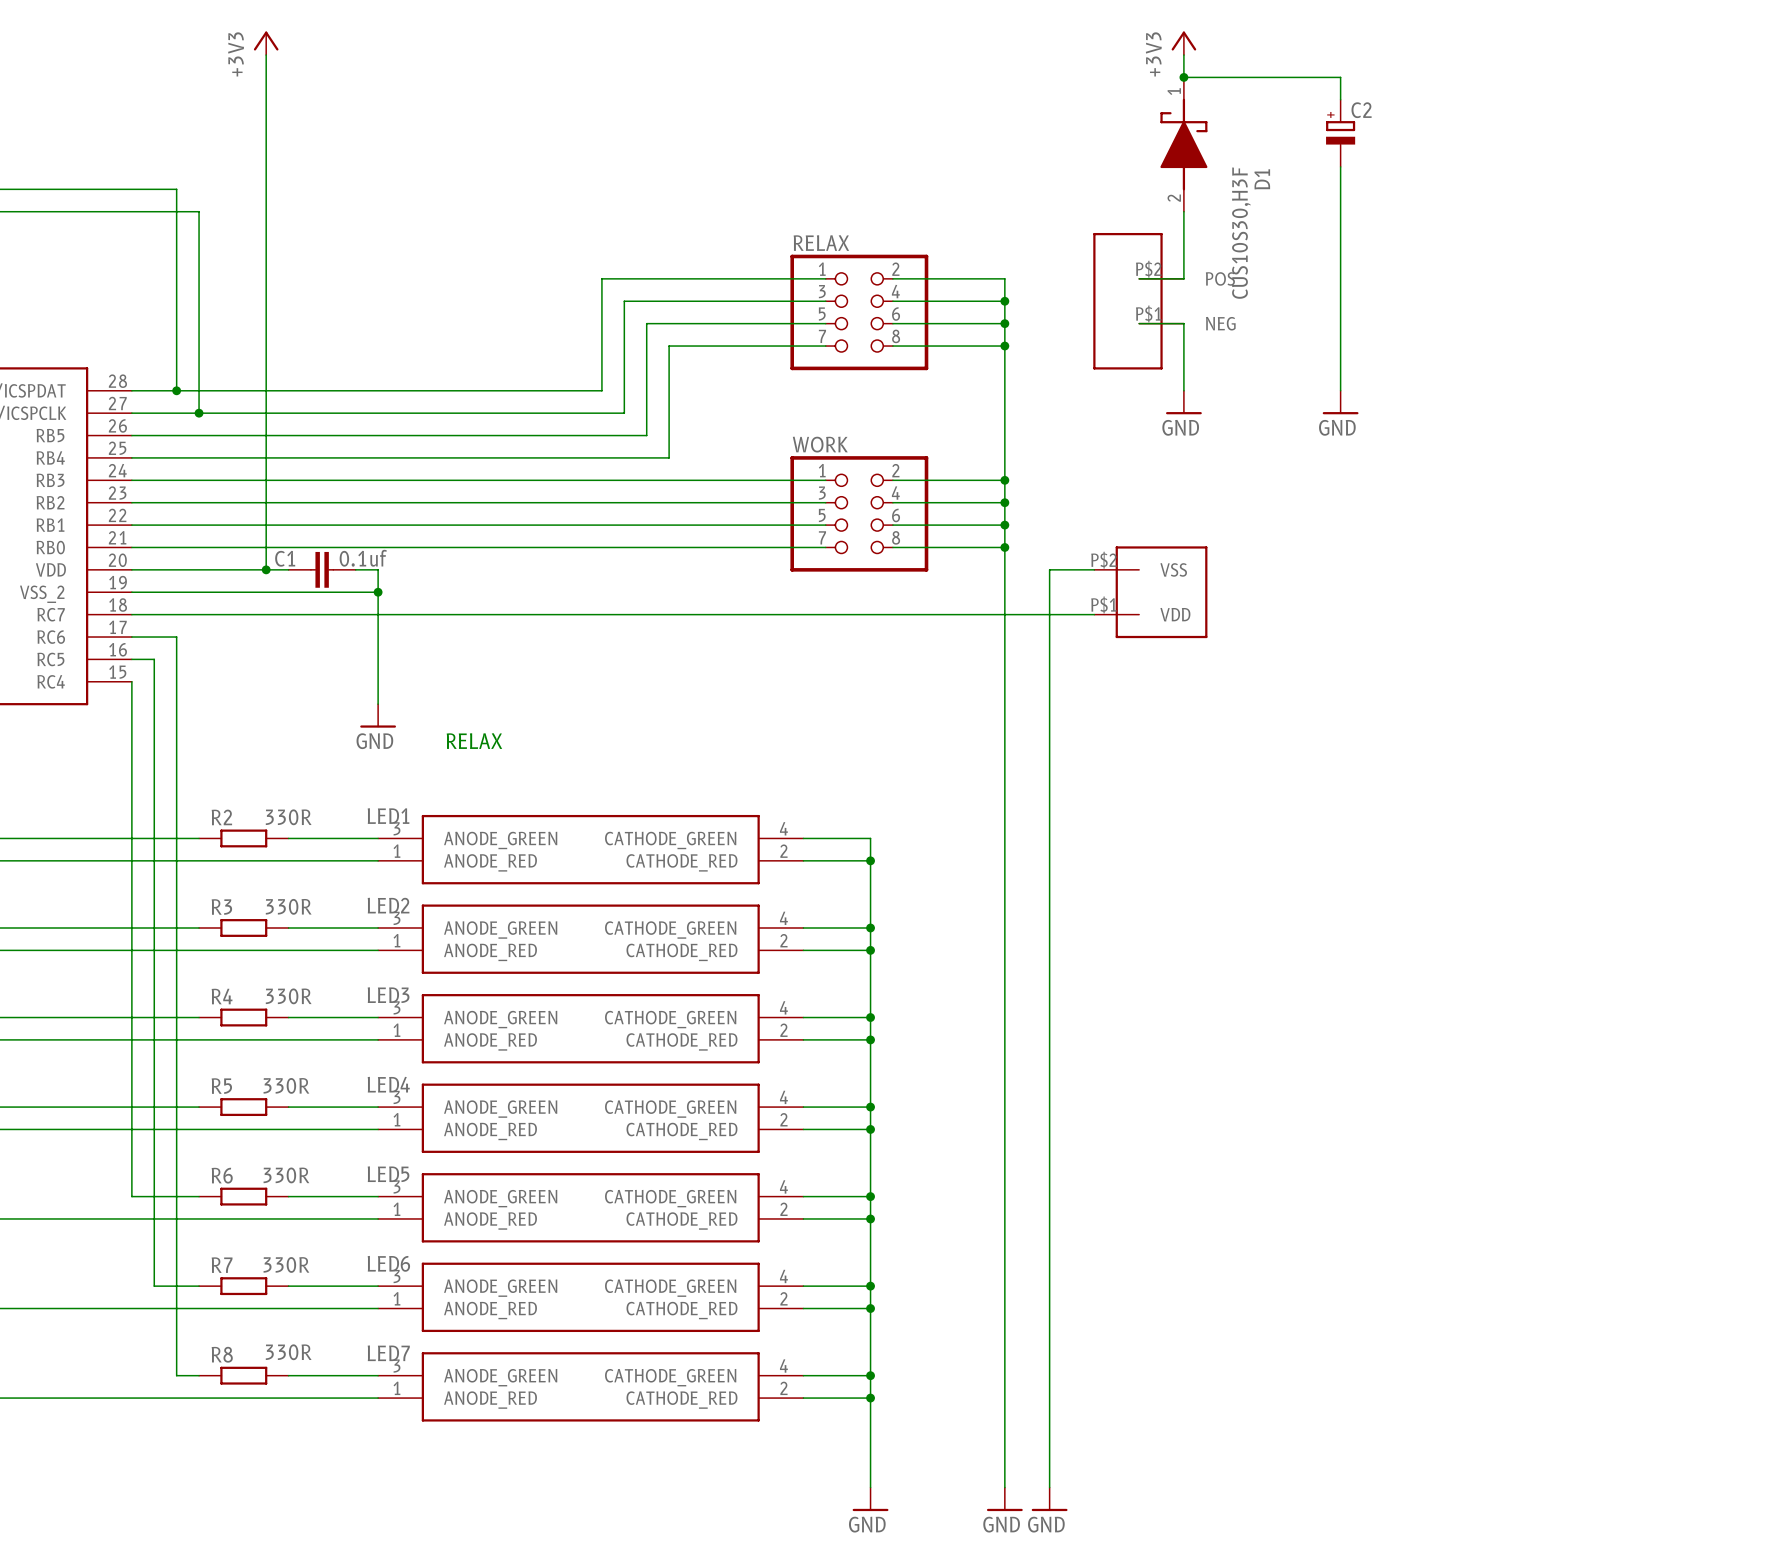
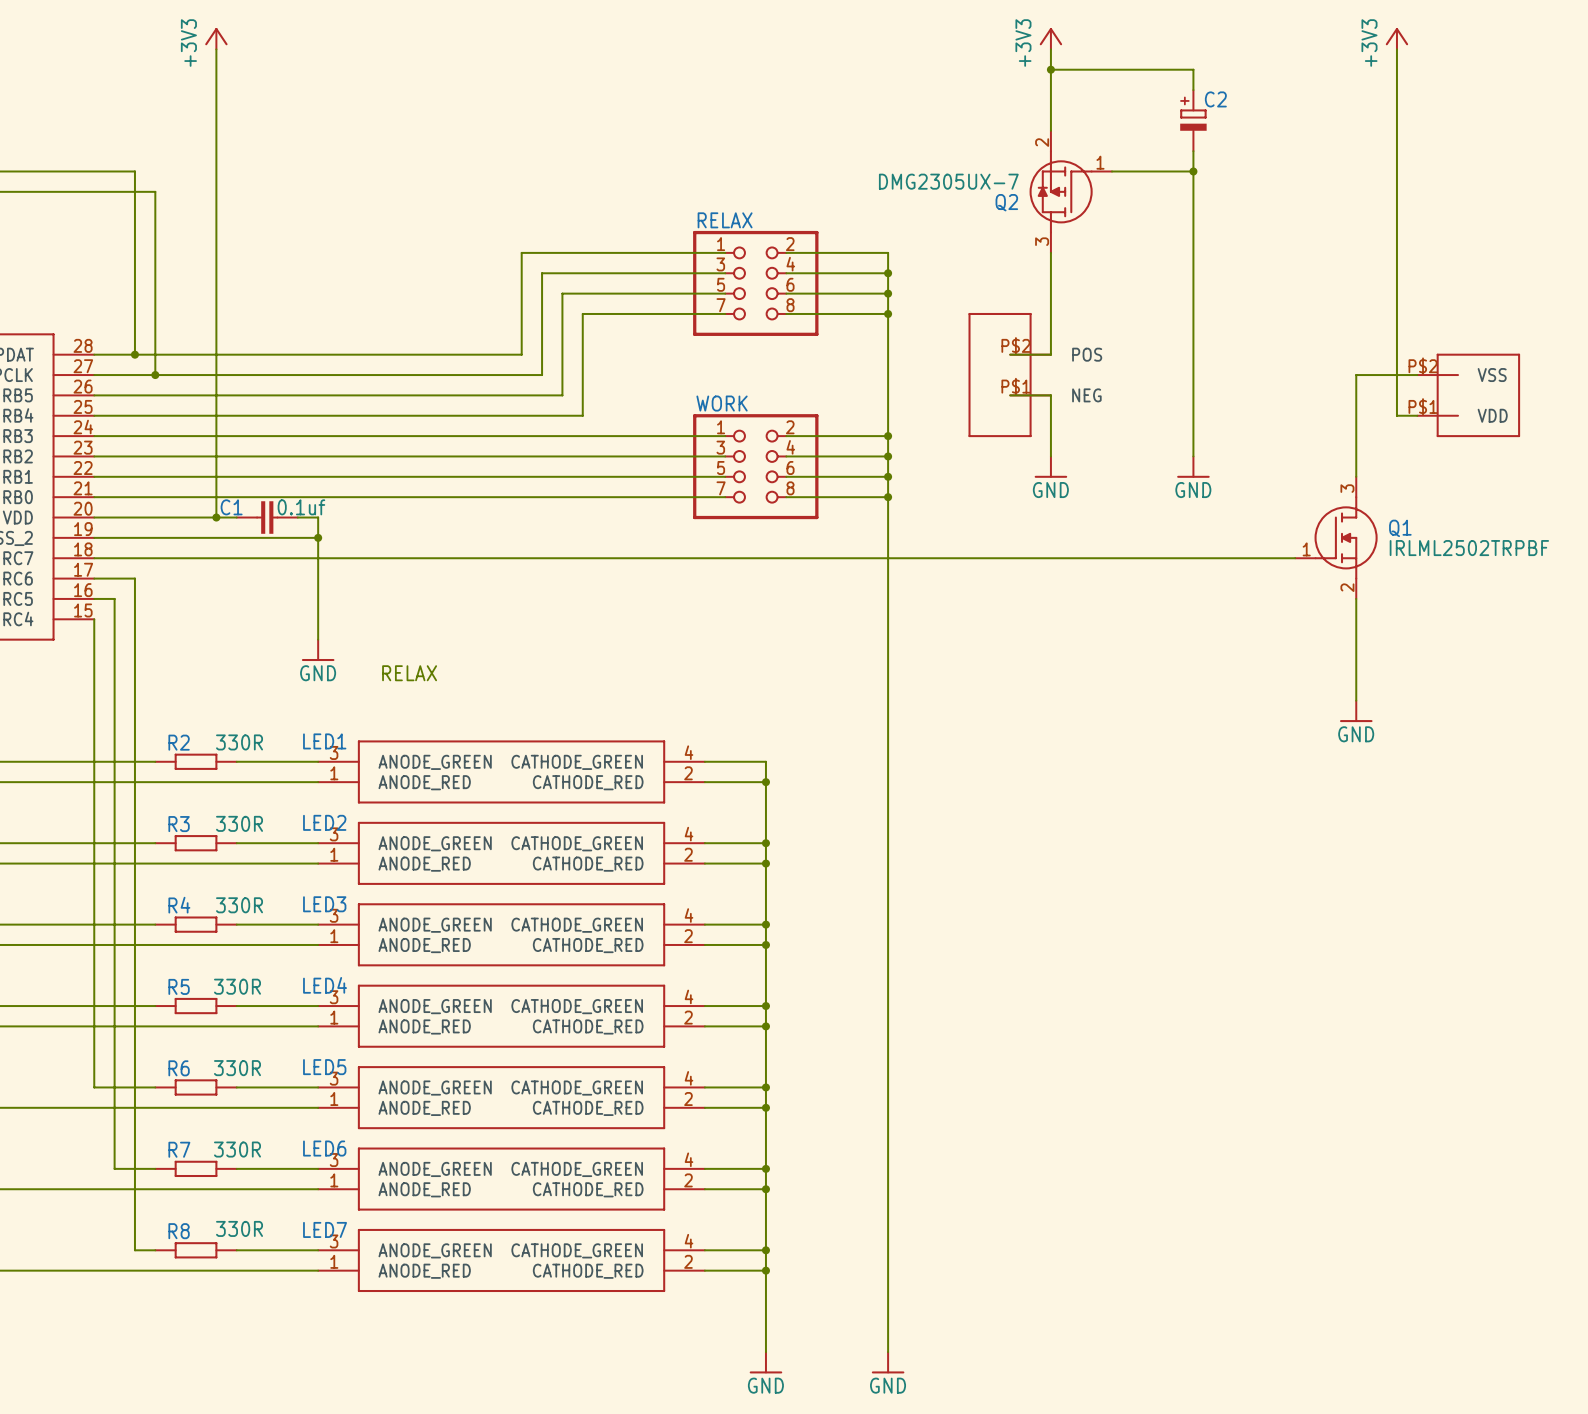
power symbol: none -> +3V3 (1396, 38)
wire: none -> (1396, 49) (1396, 415) (1417, 415)
D1: CUS10S30,H3F (1183, 144) -> none
wire: none -> (1112, 171) (1193, 171)
junction: none -> (1193, 171)
wire: (1183, 211) (1183, 278) (1139, 278) -> none
Q2: none -> DMG2305UX-7 (1070, 191)
part position: (1138, 301) -> (1009, 375)
wire: (1139, 323) (1183, 323) -> (1050, 252) (1050, 293)
wire: none -> (1010, 354) (1050, 354)
wire: none -> (1193, 354) (1193, 456)
power symbol: GND (1183, 402) -> none
power symbol: GND (1340, 402) -> none
wire: none -> (1417, 375) (1356, 375) (1356, 476)
wire: none -> (1010, 395) (1050, 395) (1050, 456)
part: none -> (1468, 395)
power symbol: none -> GND (1050, 467)
power symbol: none -> GND (1193, 467)
wire: (1094, 569) (1049, 569) (1049, 1487) -> none
part: (1150, 592) -> none
Q1: none -> IRLML2502TRPBF (1336, 537)
wire: none -> (969, 558) (1295, 558)
wire: none -> (1356, 598) (1356, 700)
power symbol: none -> GND (1356, 711)
power symbol: GND (1049, 1499) -> none

